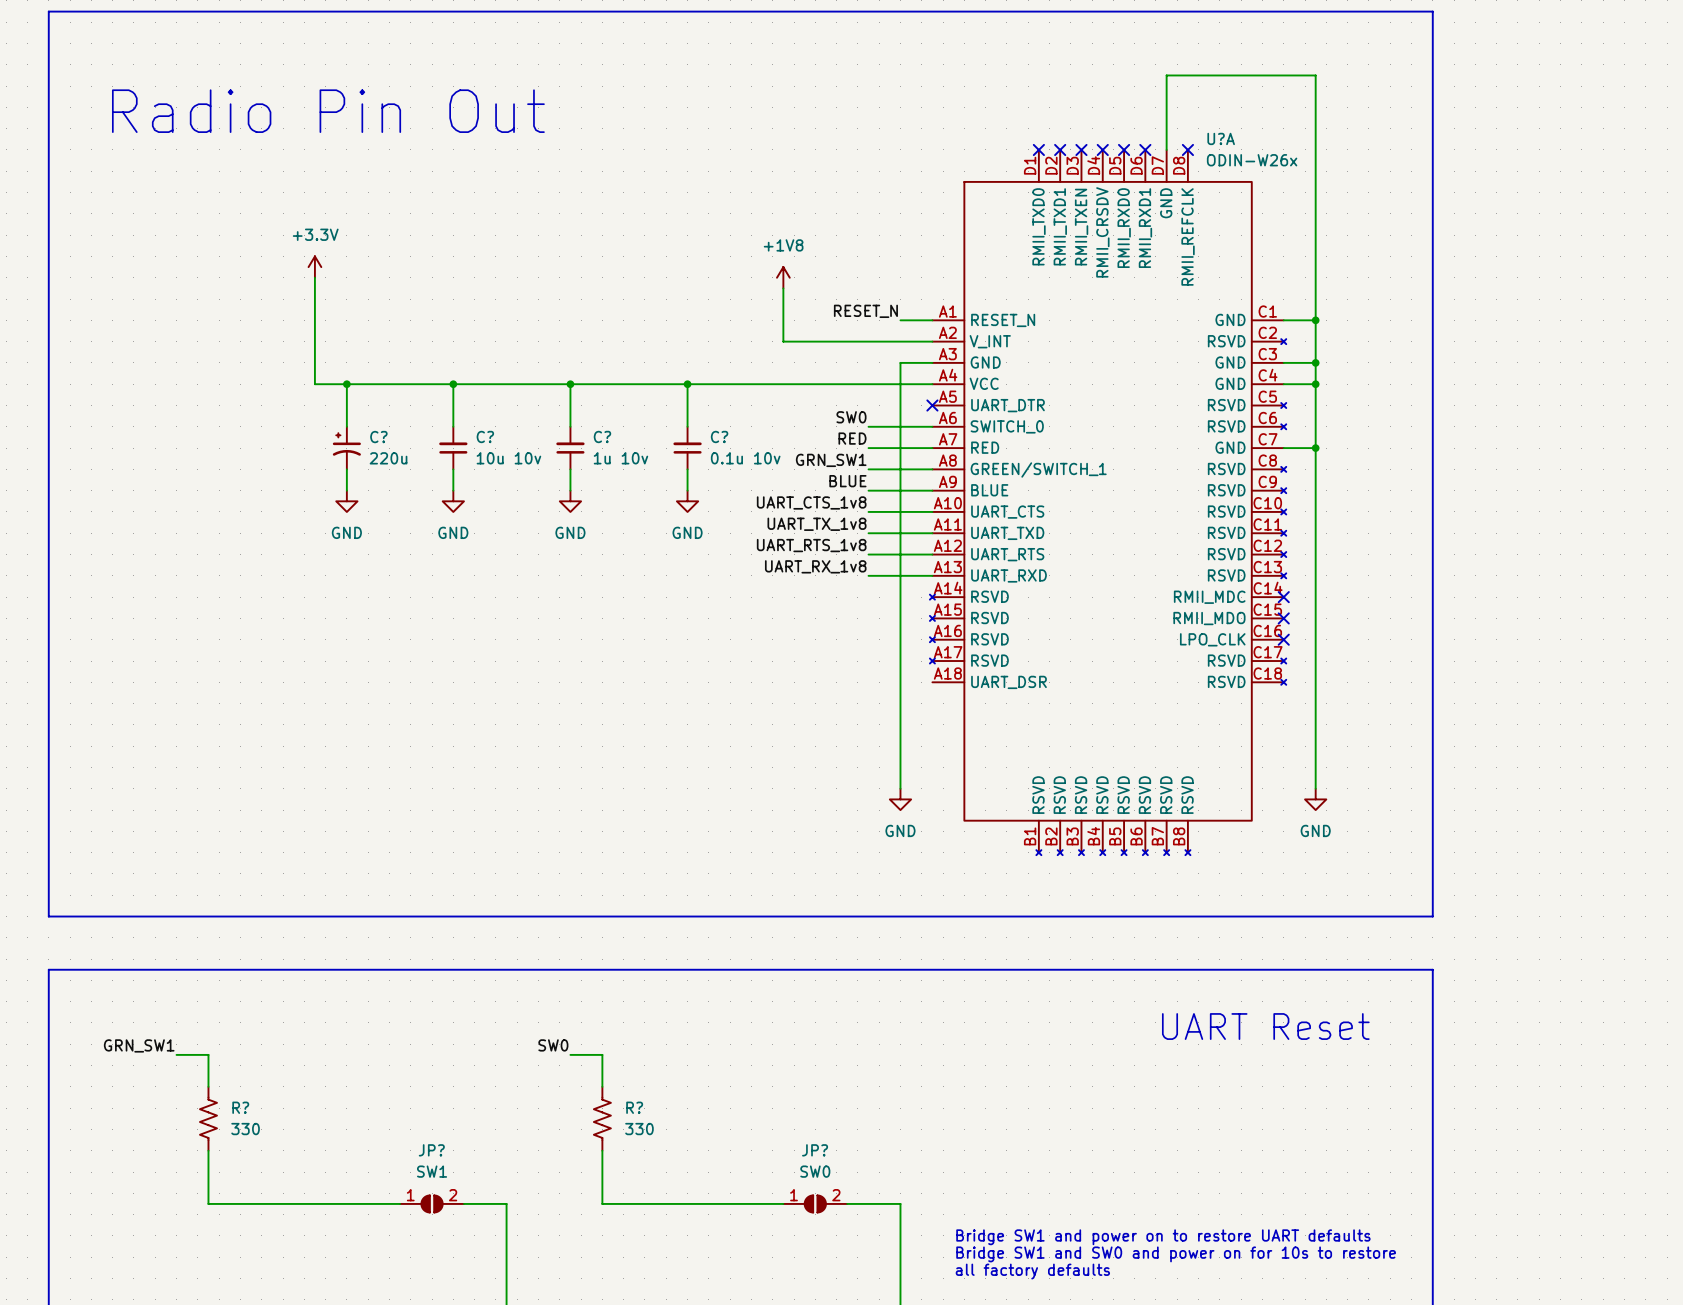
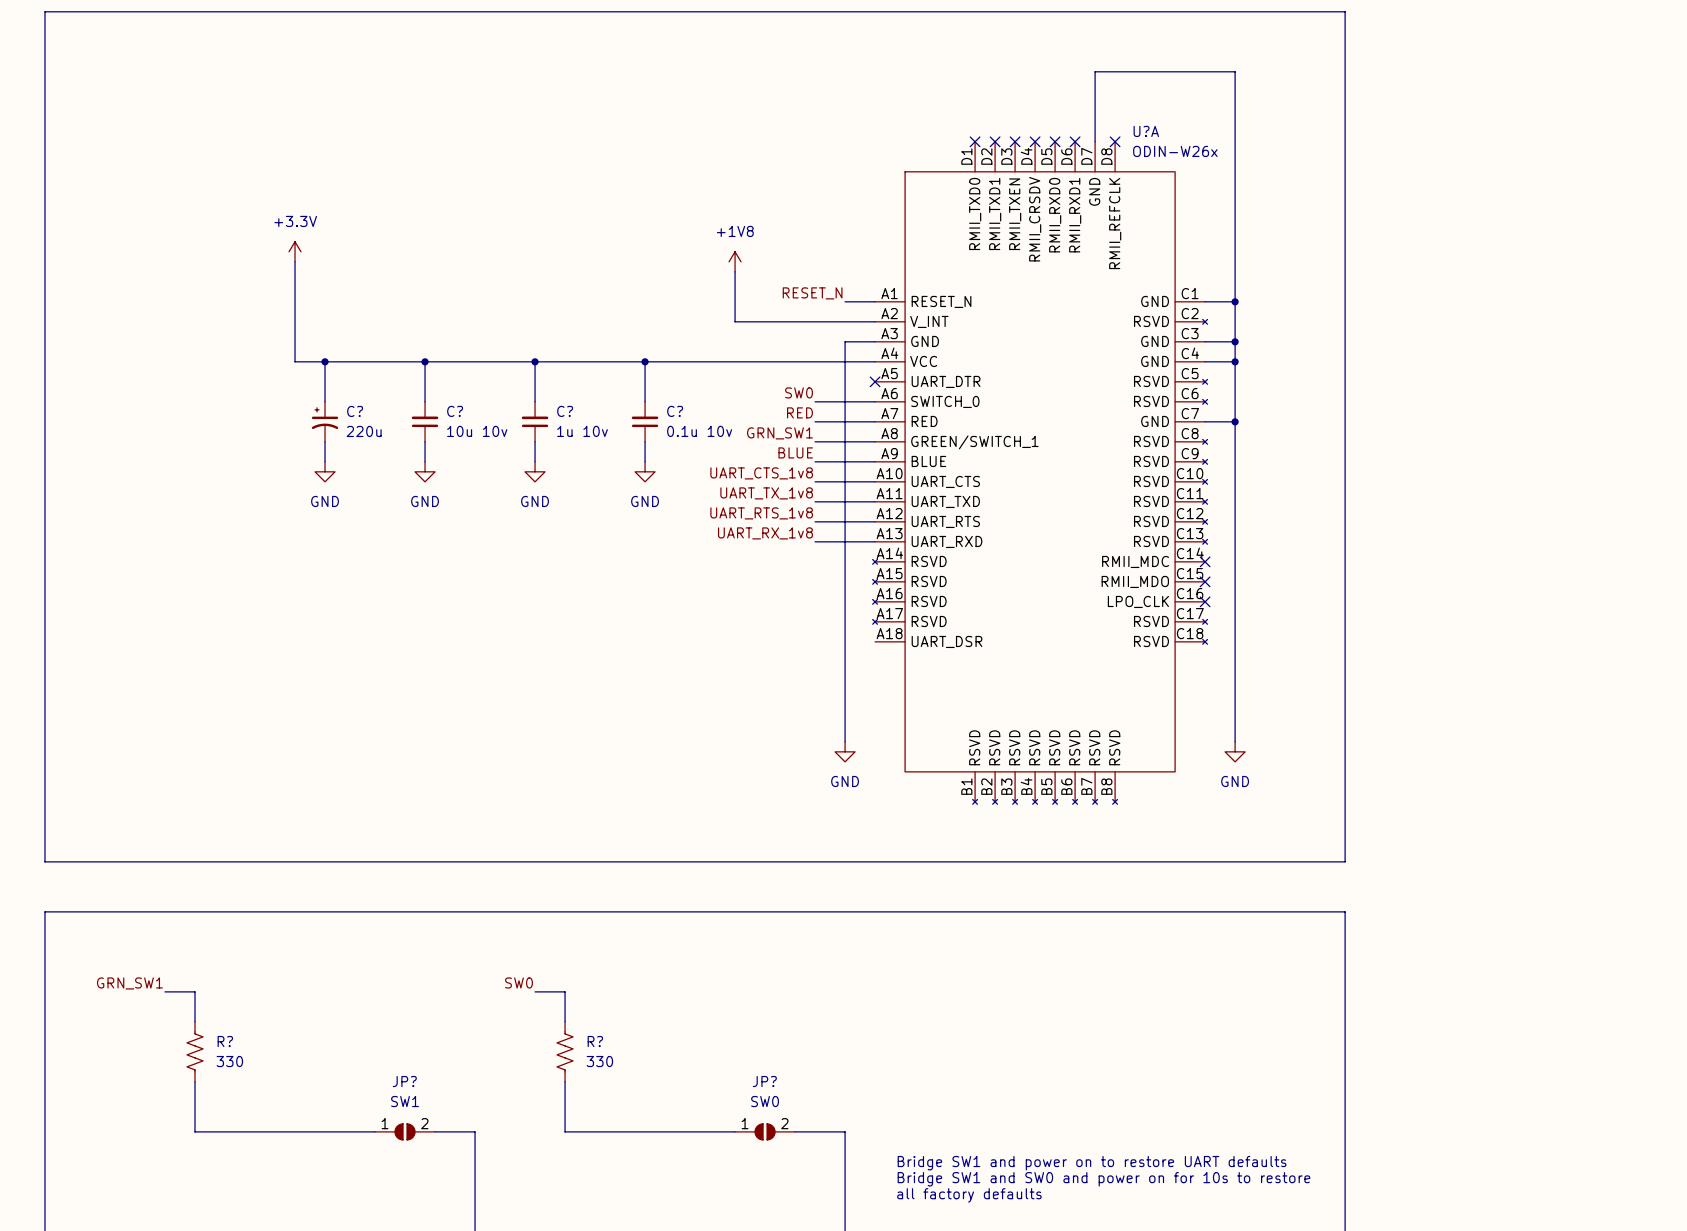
text: Radio Pin Out (328, 111) -> none
text: UART Reset (1265, 1026) -> none

